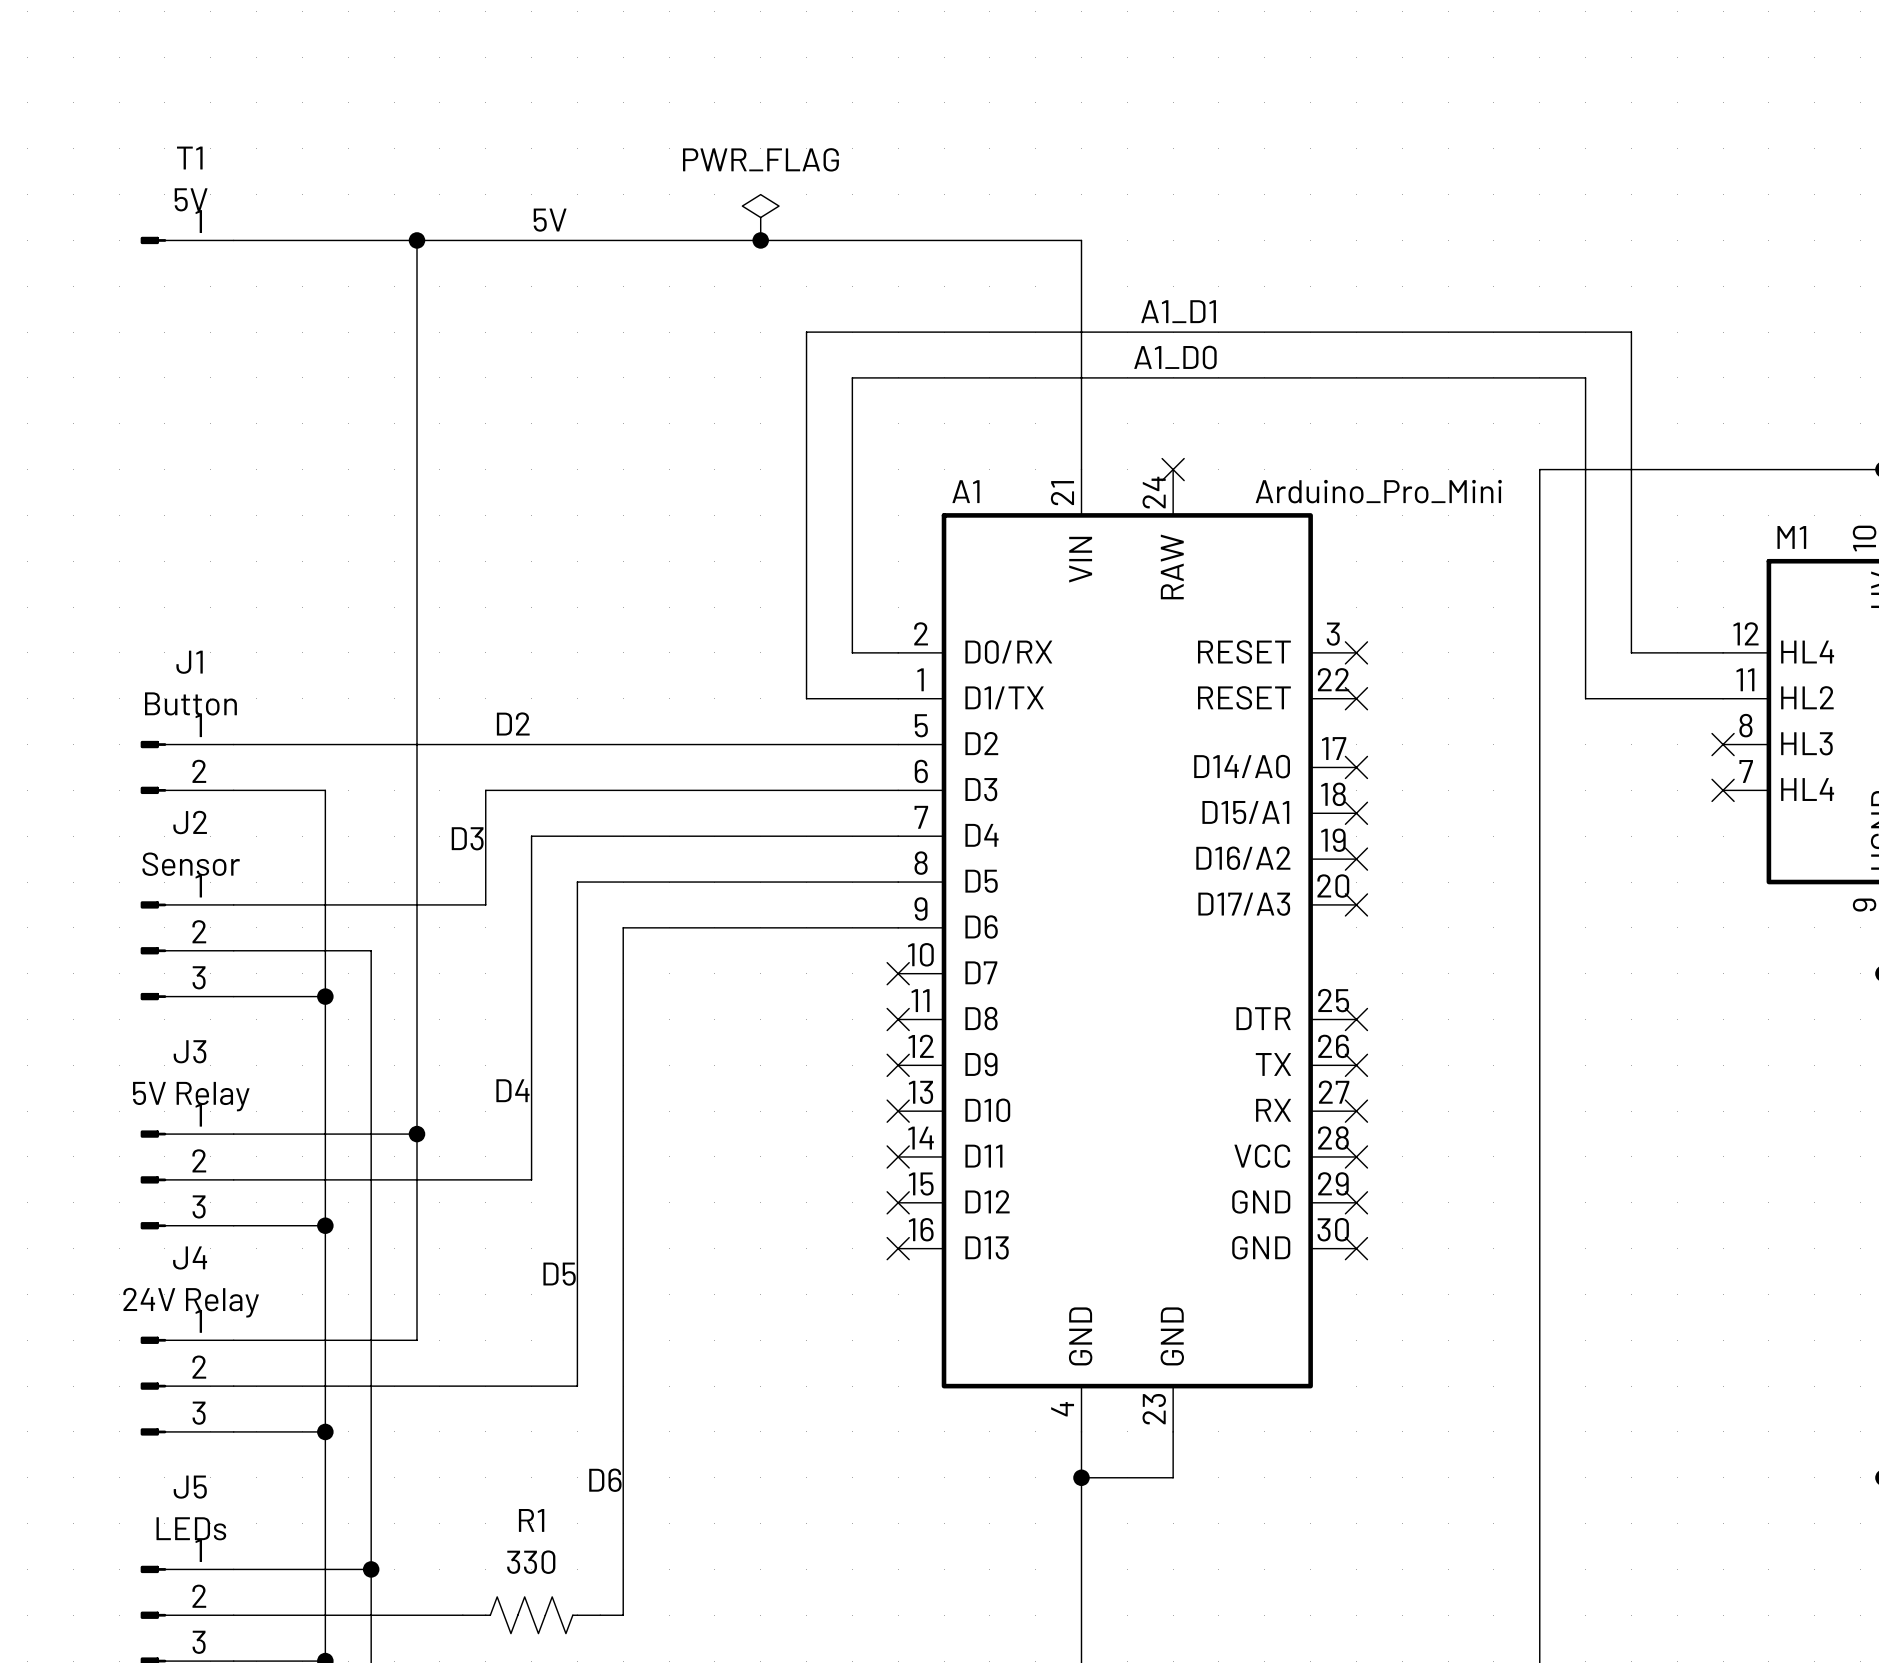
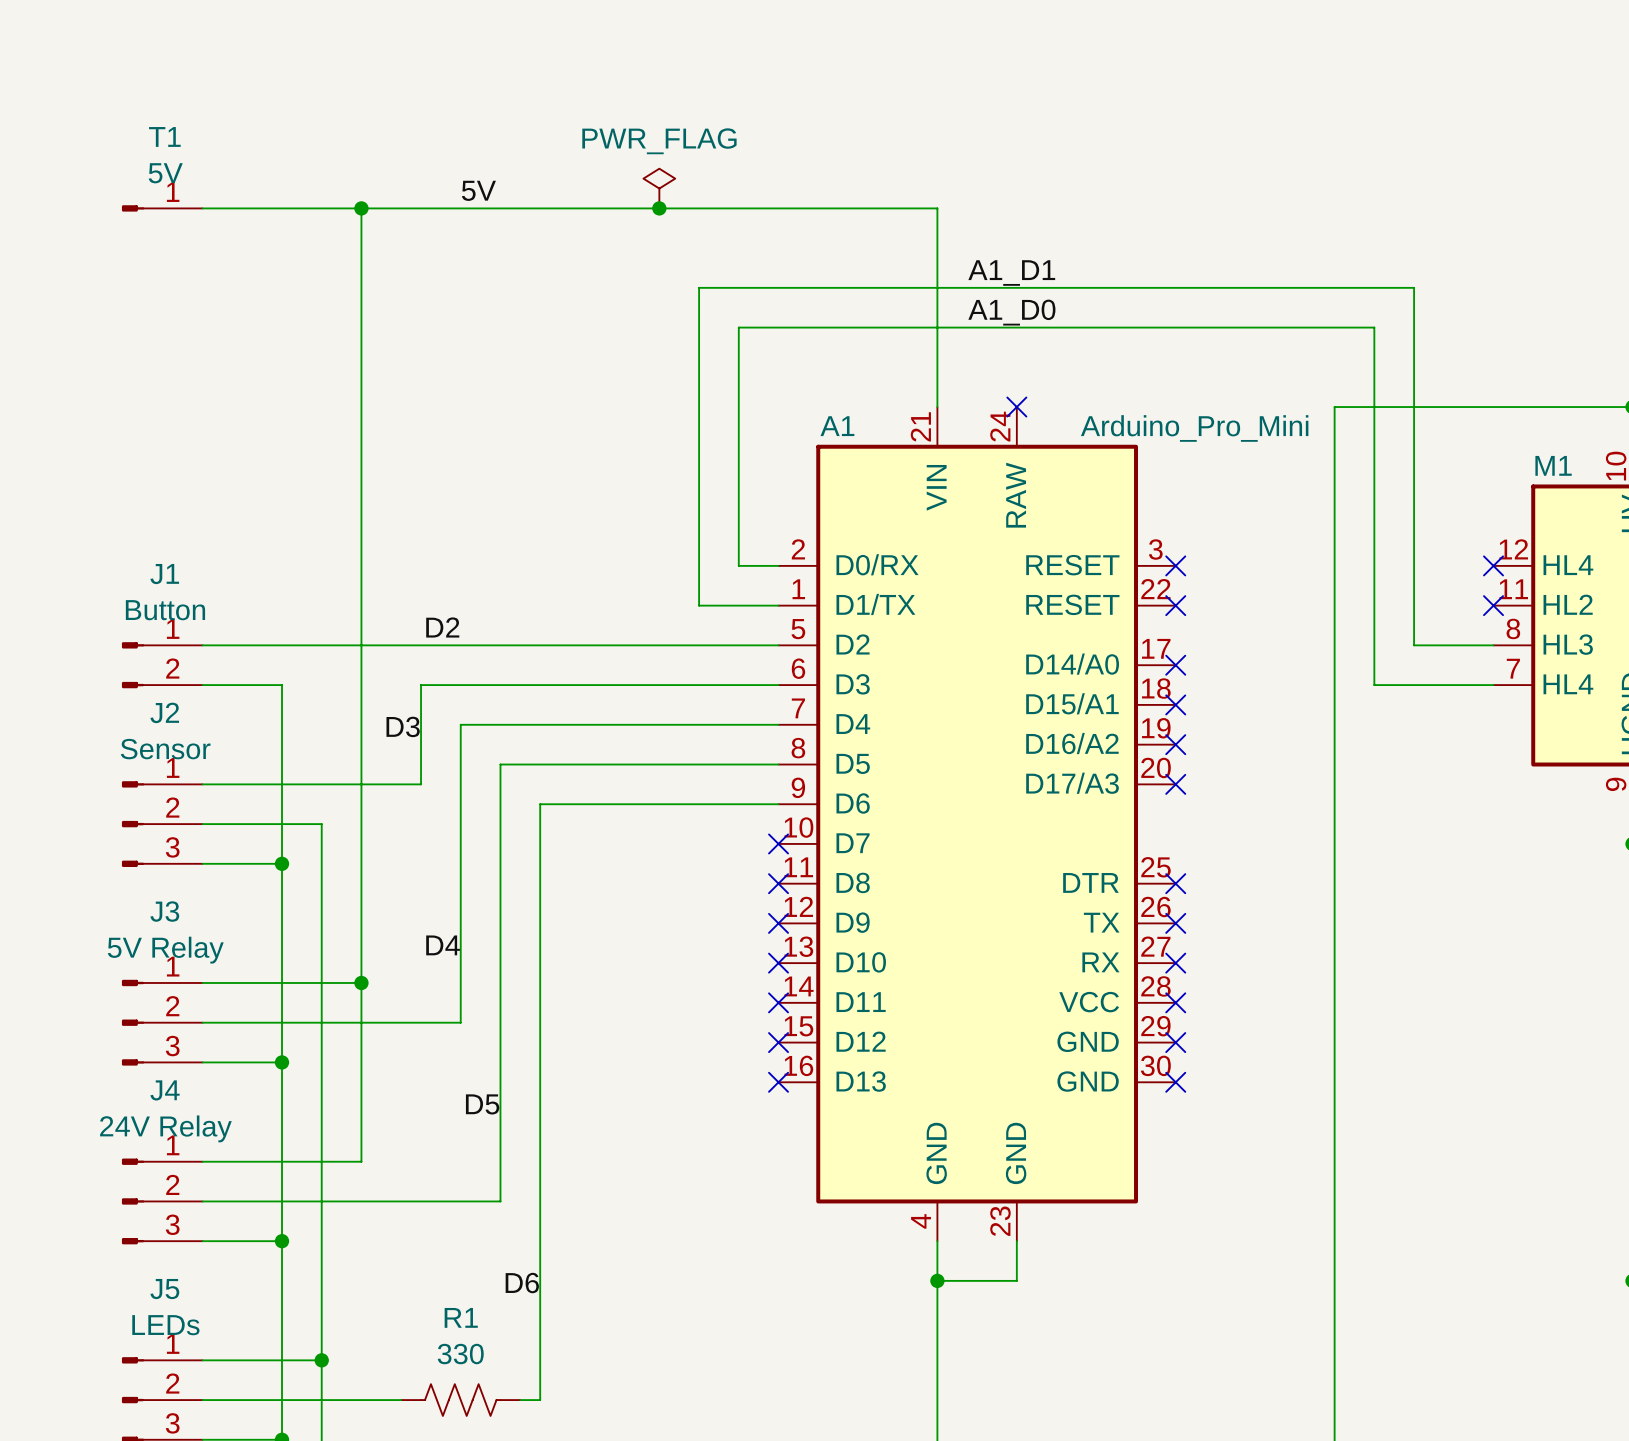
wire: (1631, 652) (1723, 652) -> (1414, 565) (1414, 645) (1493, 645)
no-connect mark: none -> (1493, 565)
wire: (1585, 698) (1723, 698) -> (1374, 605) (1374, 685) (1493, 685)
no-connect mark: none -> (1493, 605)
no-connect mark: (1723, 744) -> none
no-connect mark: (1723, 790) -> none

